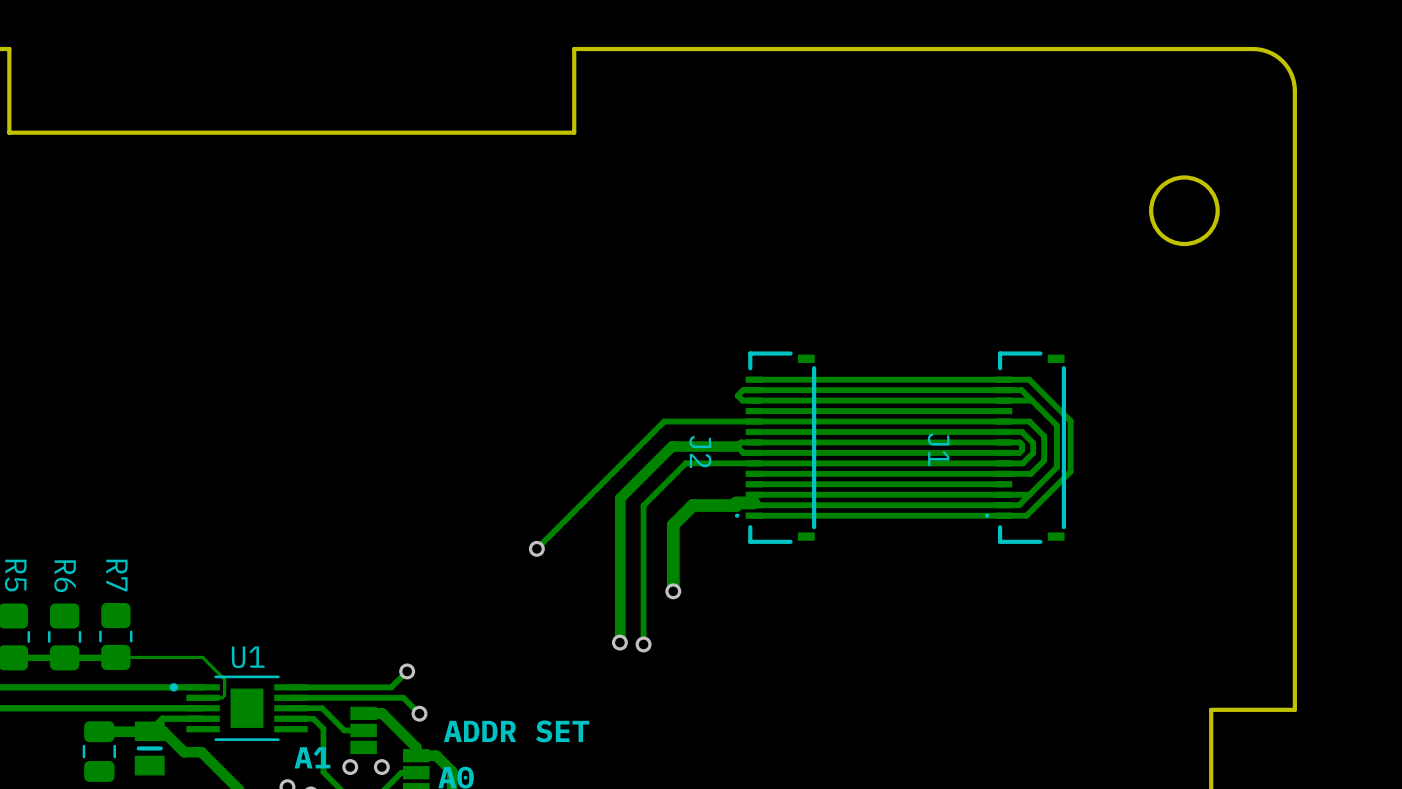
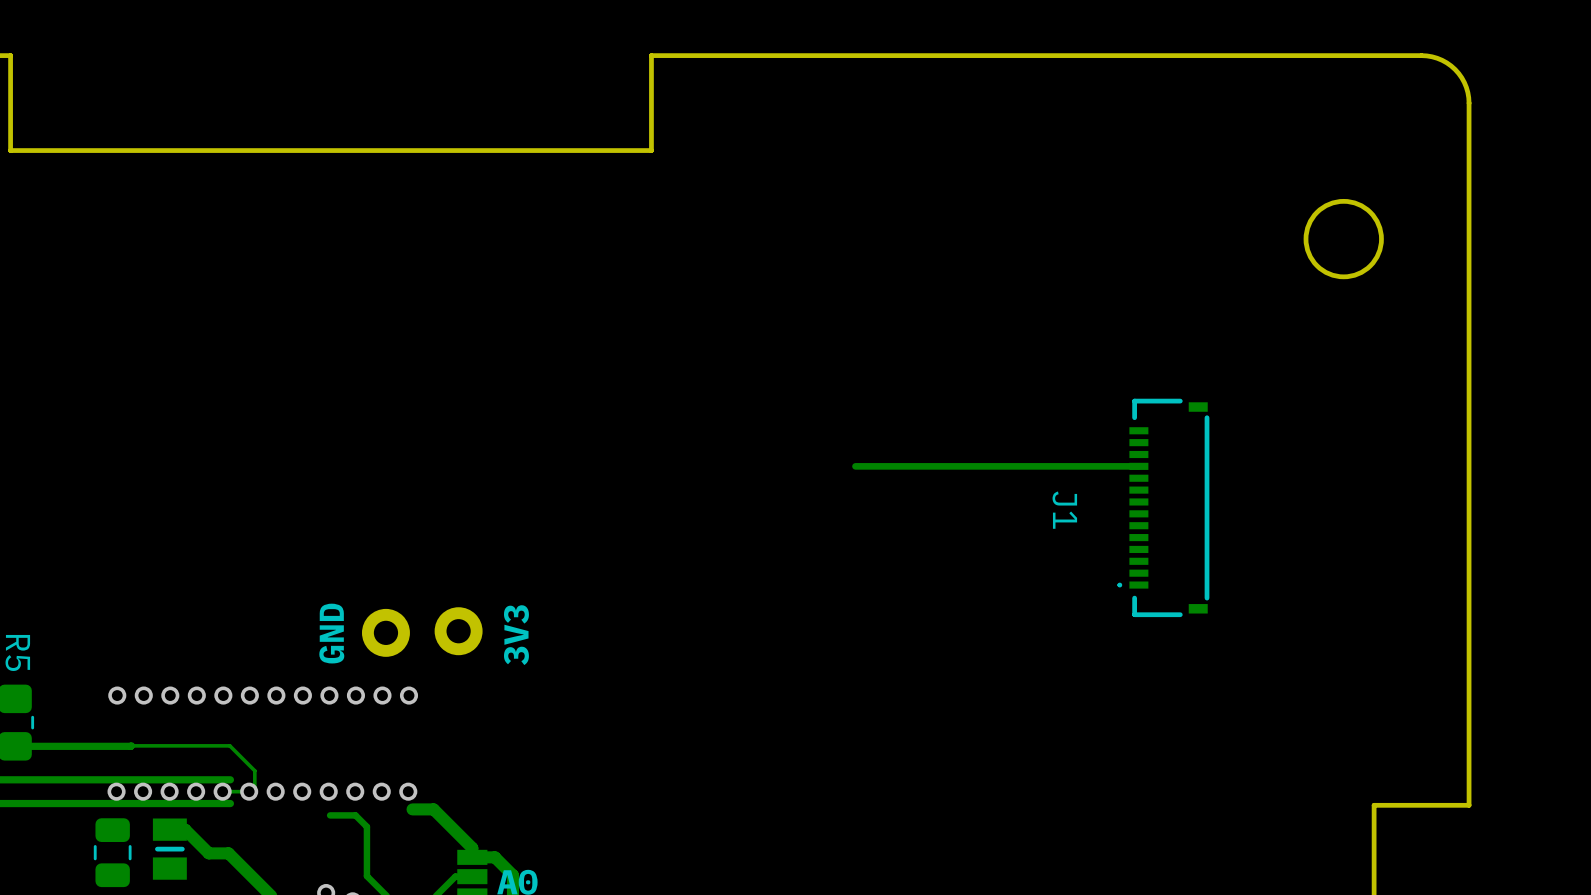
track: (754, 379) (1029, 379) (1070, 421) (1070, 471) (1026, 515) (754, 515) -> none
track: (1031, 400) (742, 400) (737, 395) (743, 390) (1021, 390) (1057, 425) (1057, 467) (1019, 505) (754, 505) (754, 494) (1029, 494) -> none
track: (754, 431) (1021, 431) (1033, 443) (1033, 453) (1022, 463) (685, 463) (643, 505) (643, 644) -> none
track: (736, 446) (672, 446) (620, 498) (619, 642) -> none
track: (736, 446) (743, 452) (1019, 452) (1022, 450) (1022, 444) (1019, 442) (740, 442) (736, 446) -> none
J2: (775, 447) -> none
track: (754, 473) (1030, 473) (1044, 460) (1044, 436) (1029, 421) (664, 421) (536, 548) -> none
track: (1003, 484) (754, 484) -> none
track: (754, 502) (736, 502) (736, 505) (692, 505) (673, 524) (673, 591) -> none
via: (536, 548) -> none
part: none -> (458, 631)
part: none -> (385, 632)
text: none -> GND (331, 633)
text: none -> 3V3 (516, 635)
via: (673, 591) -> none
via: none -> (117, 695)
via: none -> (143, 695)
via: none -> (170, 695)
via: none -> (196, 695)
via: none -> (223, 695)
via: none -> (249, 695)
via: none -> (276, 695)
via: none -> (302, 695)
via: none -> (329, 695)
via: none -> (355, 695)
via: none -> (382, 695)
via: none -> (408, 695)
R6: (64, 636) -> none
R7: (115, 636) -> none
via: (619, 642) -> none
via: (643, 644) -> none
track: (407, 671) (391, 687) (290, 687) -> none
via: (407, 671) -> none
via: none -> (116, 791)
via: none -> (143, 791)
via: none -> (169, 791)
via: none -> (196, 791)
via: none -> (222, 791)
via: none -> (249, 791)
via: none -> (275, 791)
via: none -> (302, 791)
via: none -> (328, 791)
track: (290, 697) (403, 697) (419, 713) -> none
via: none -> (355, 791)
via: none -> (381, 791)
via: none -> (408, 791)
U1: (238, 708) -> none
track: (290, 708) (322, 708) (344, 730) (363, 730) -> none
via: (419, 713) -> none
track: (203, 718) (162, 718) (149, 731) (99, 731) -> none
part: (363, 730) -> none
text: ADDR SET (516, 731) -> none
text: A1 (312, 757) -> none
via: (350, 767) -> none
via: (381, 767) -> none

